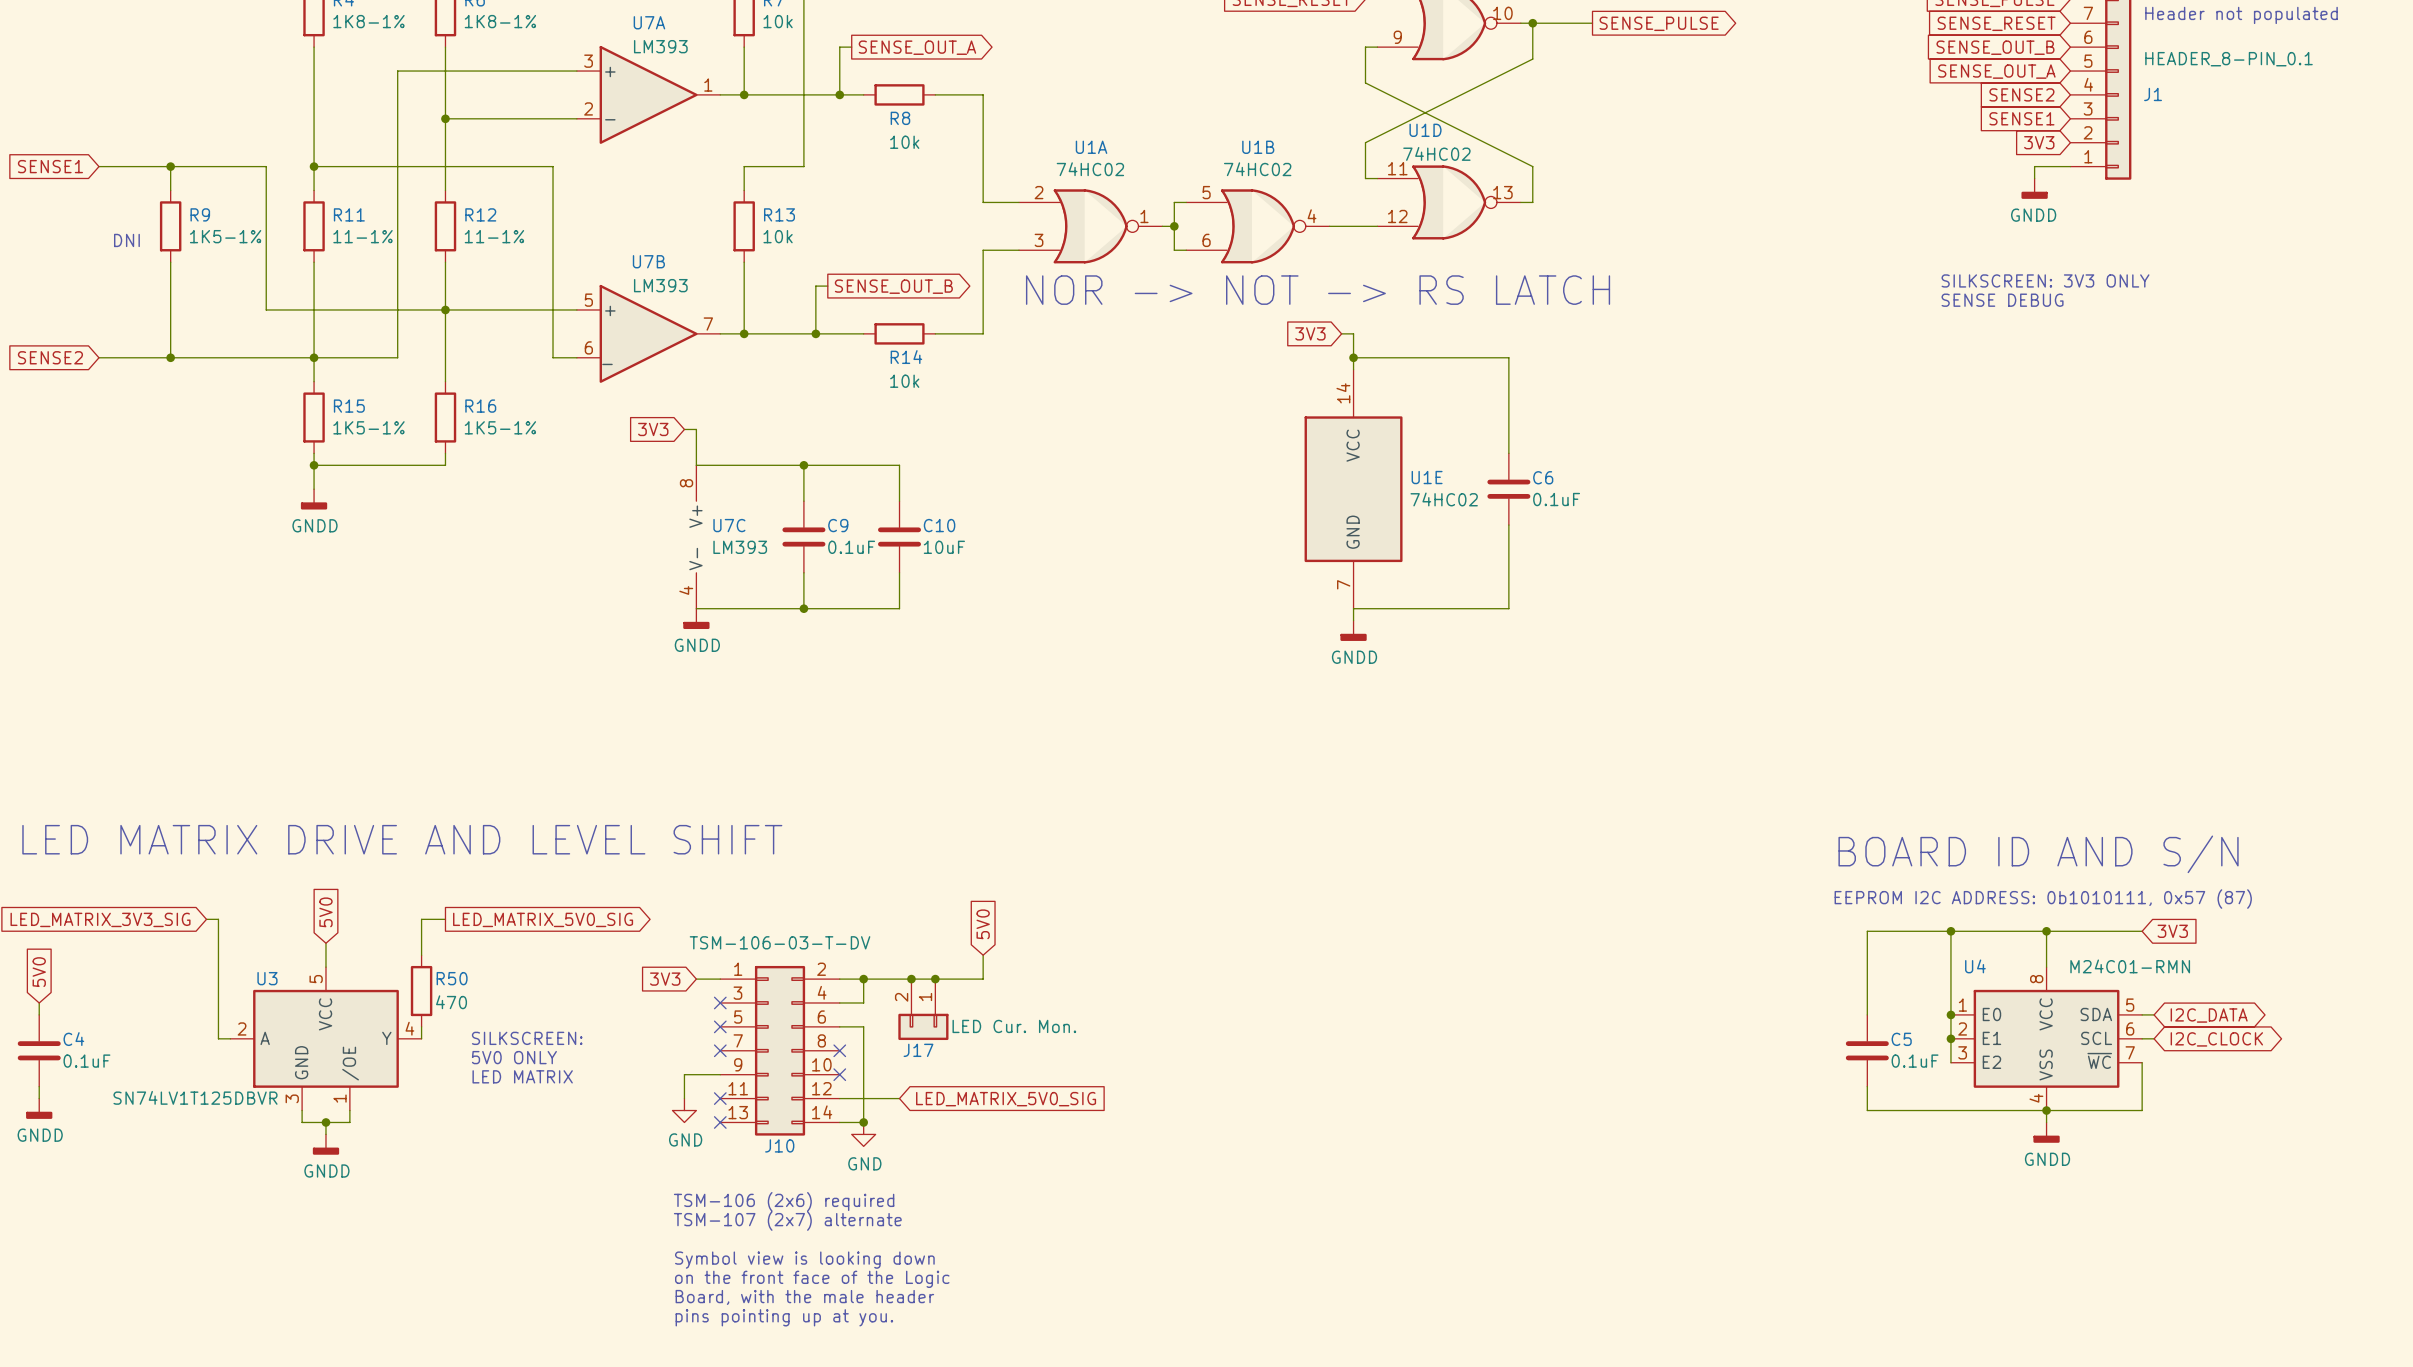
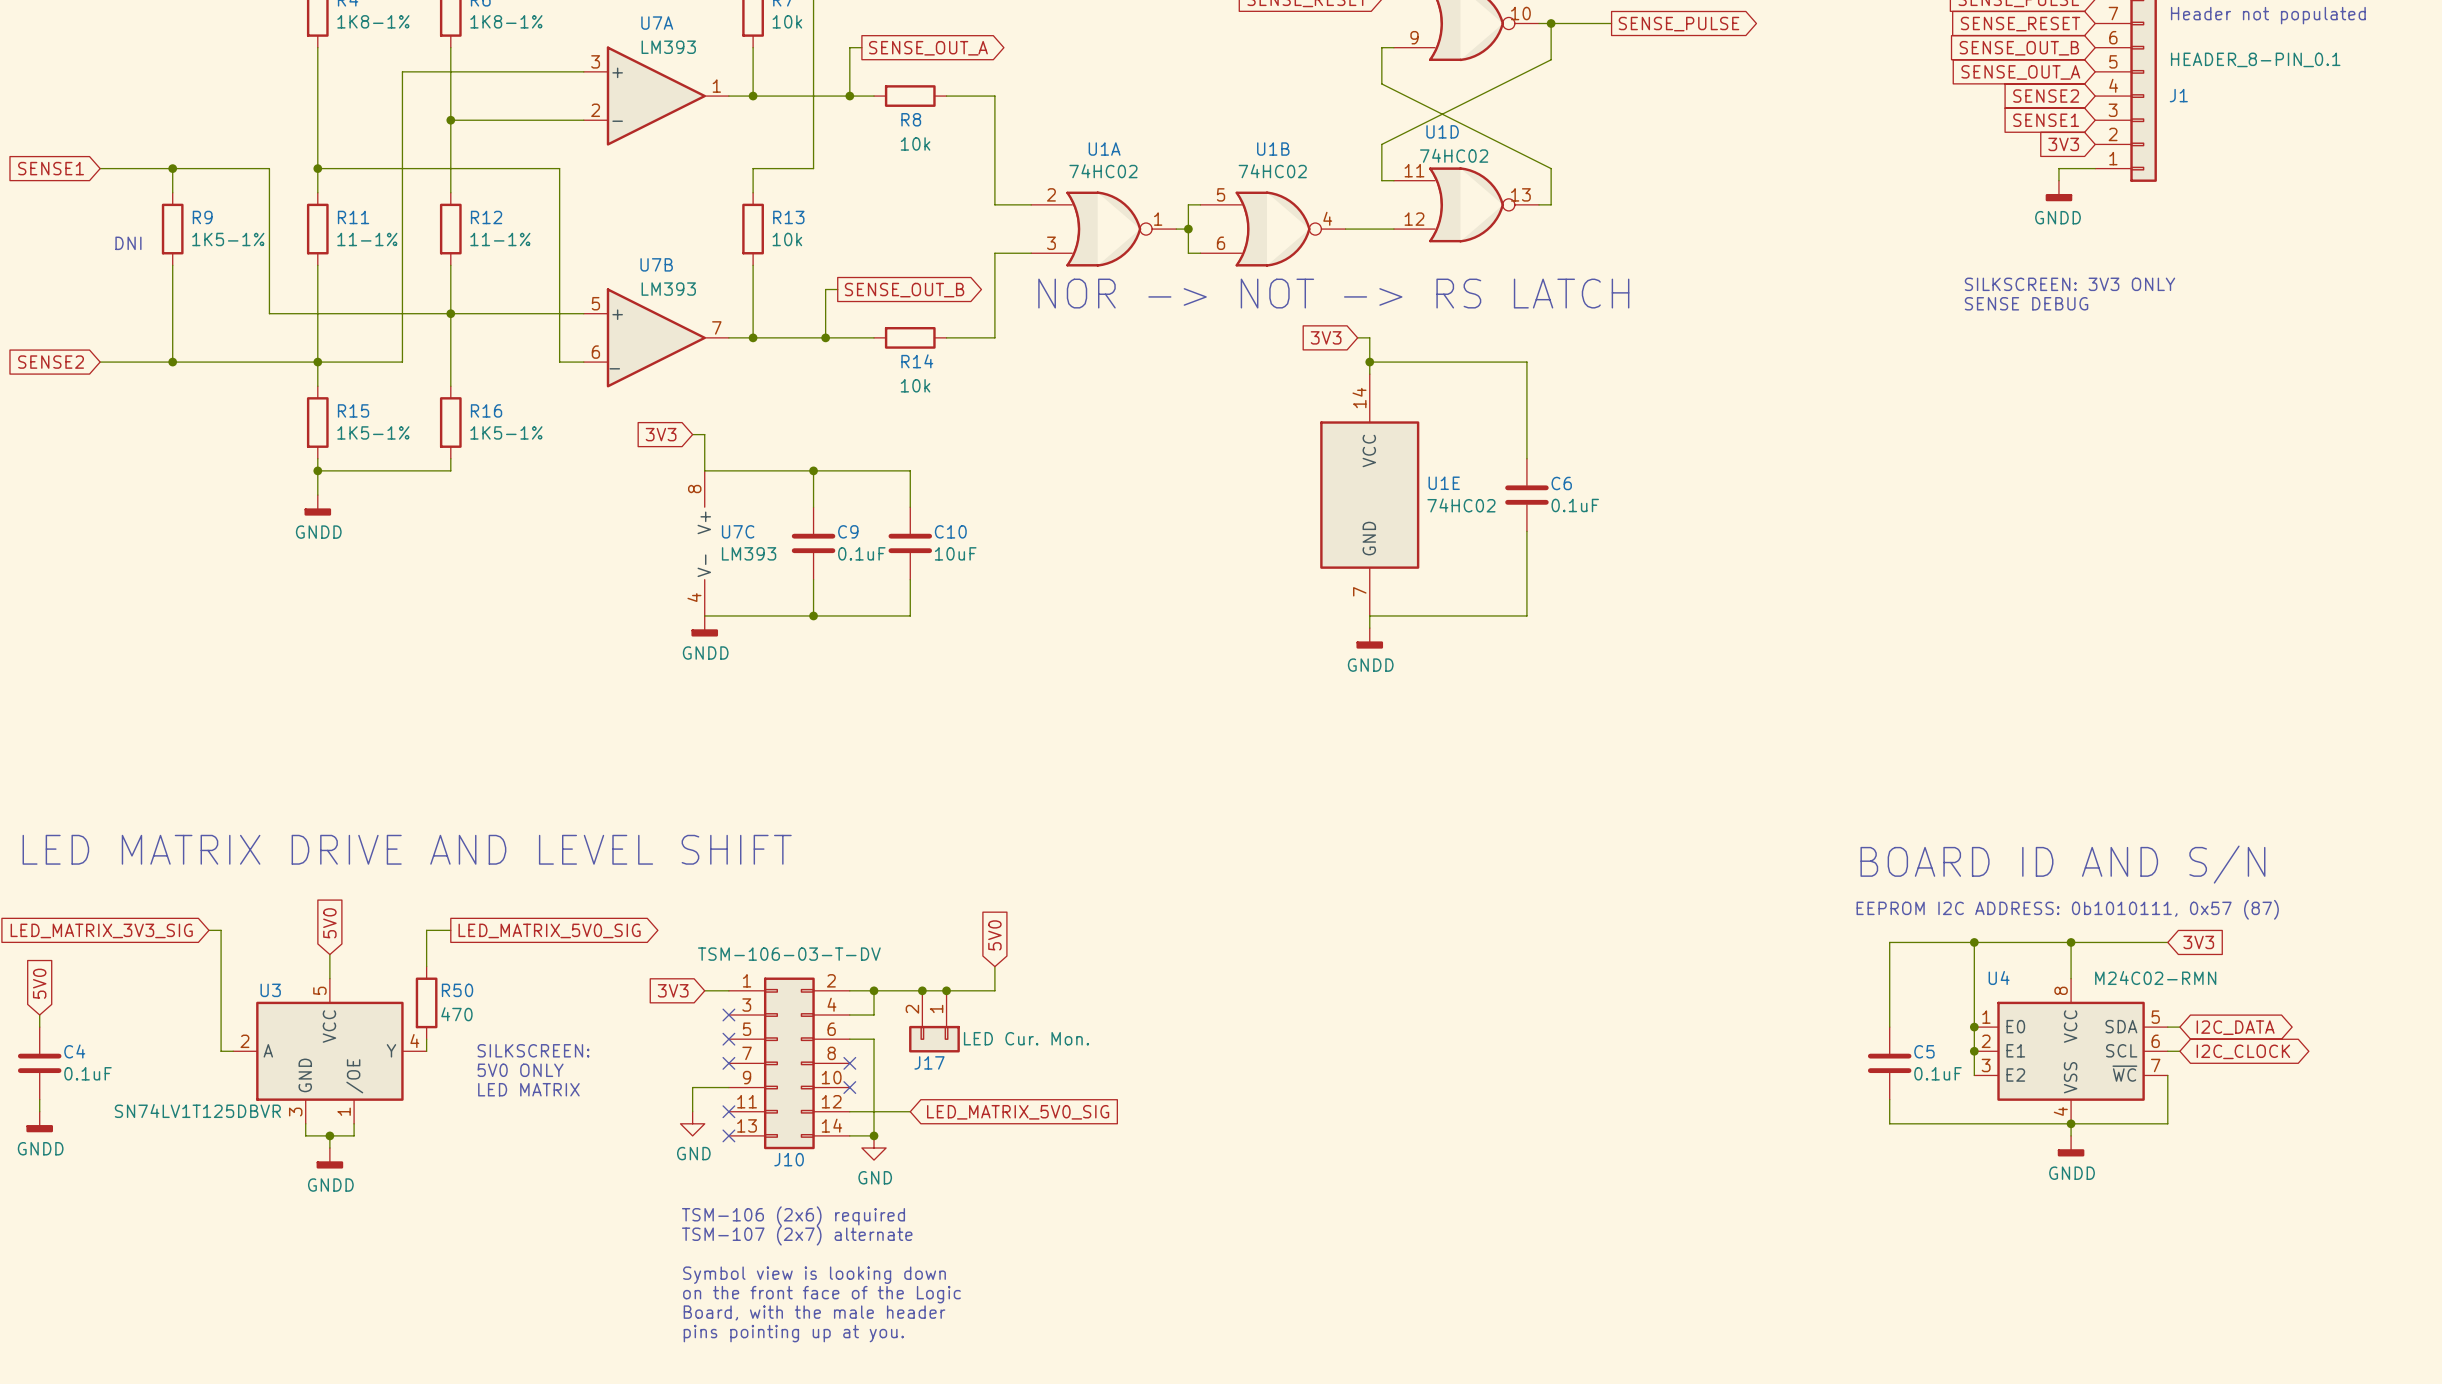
U4 value: M24C01-RMN (2130, 966) -> M24C02-RMN (2155, 977)

